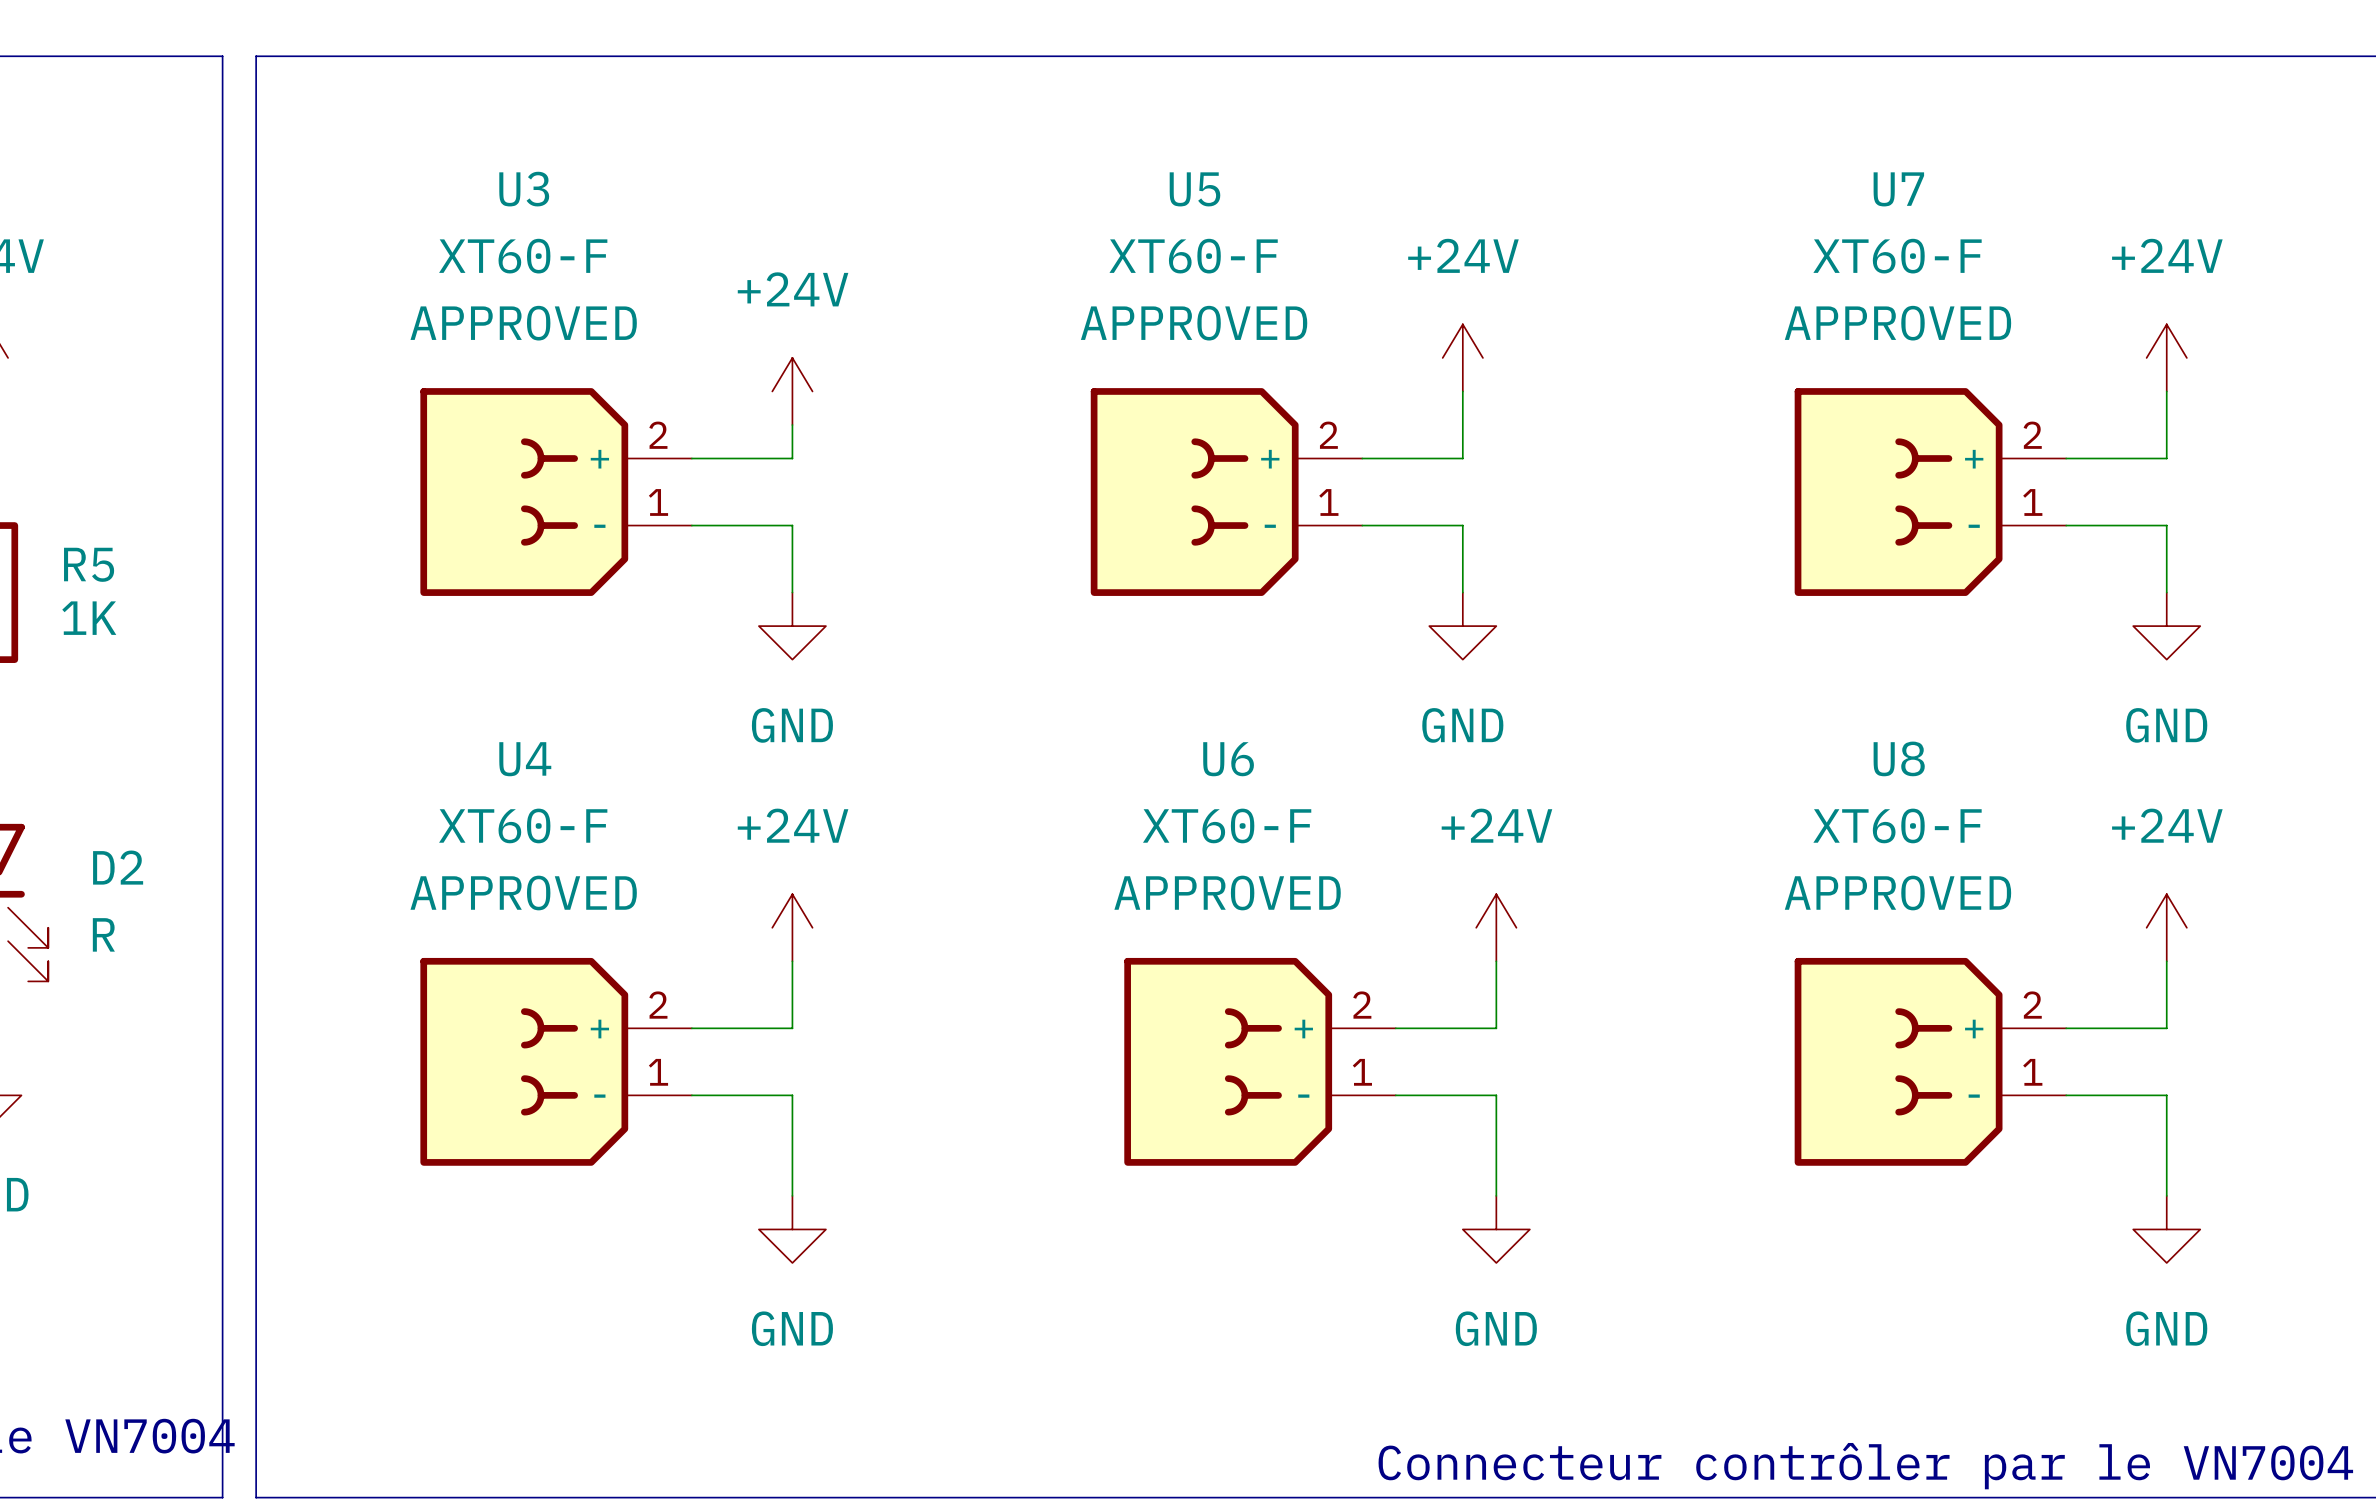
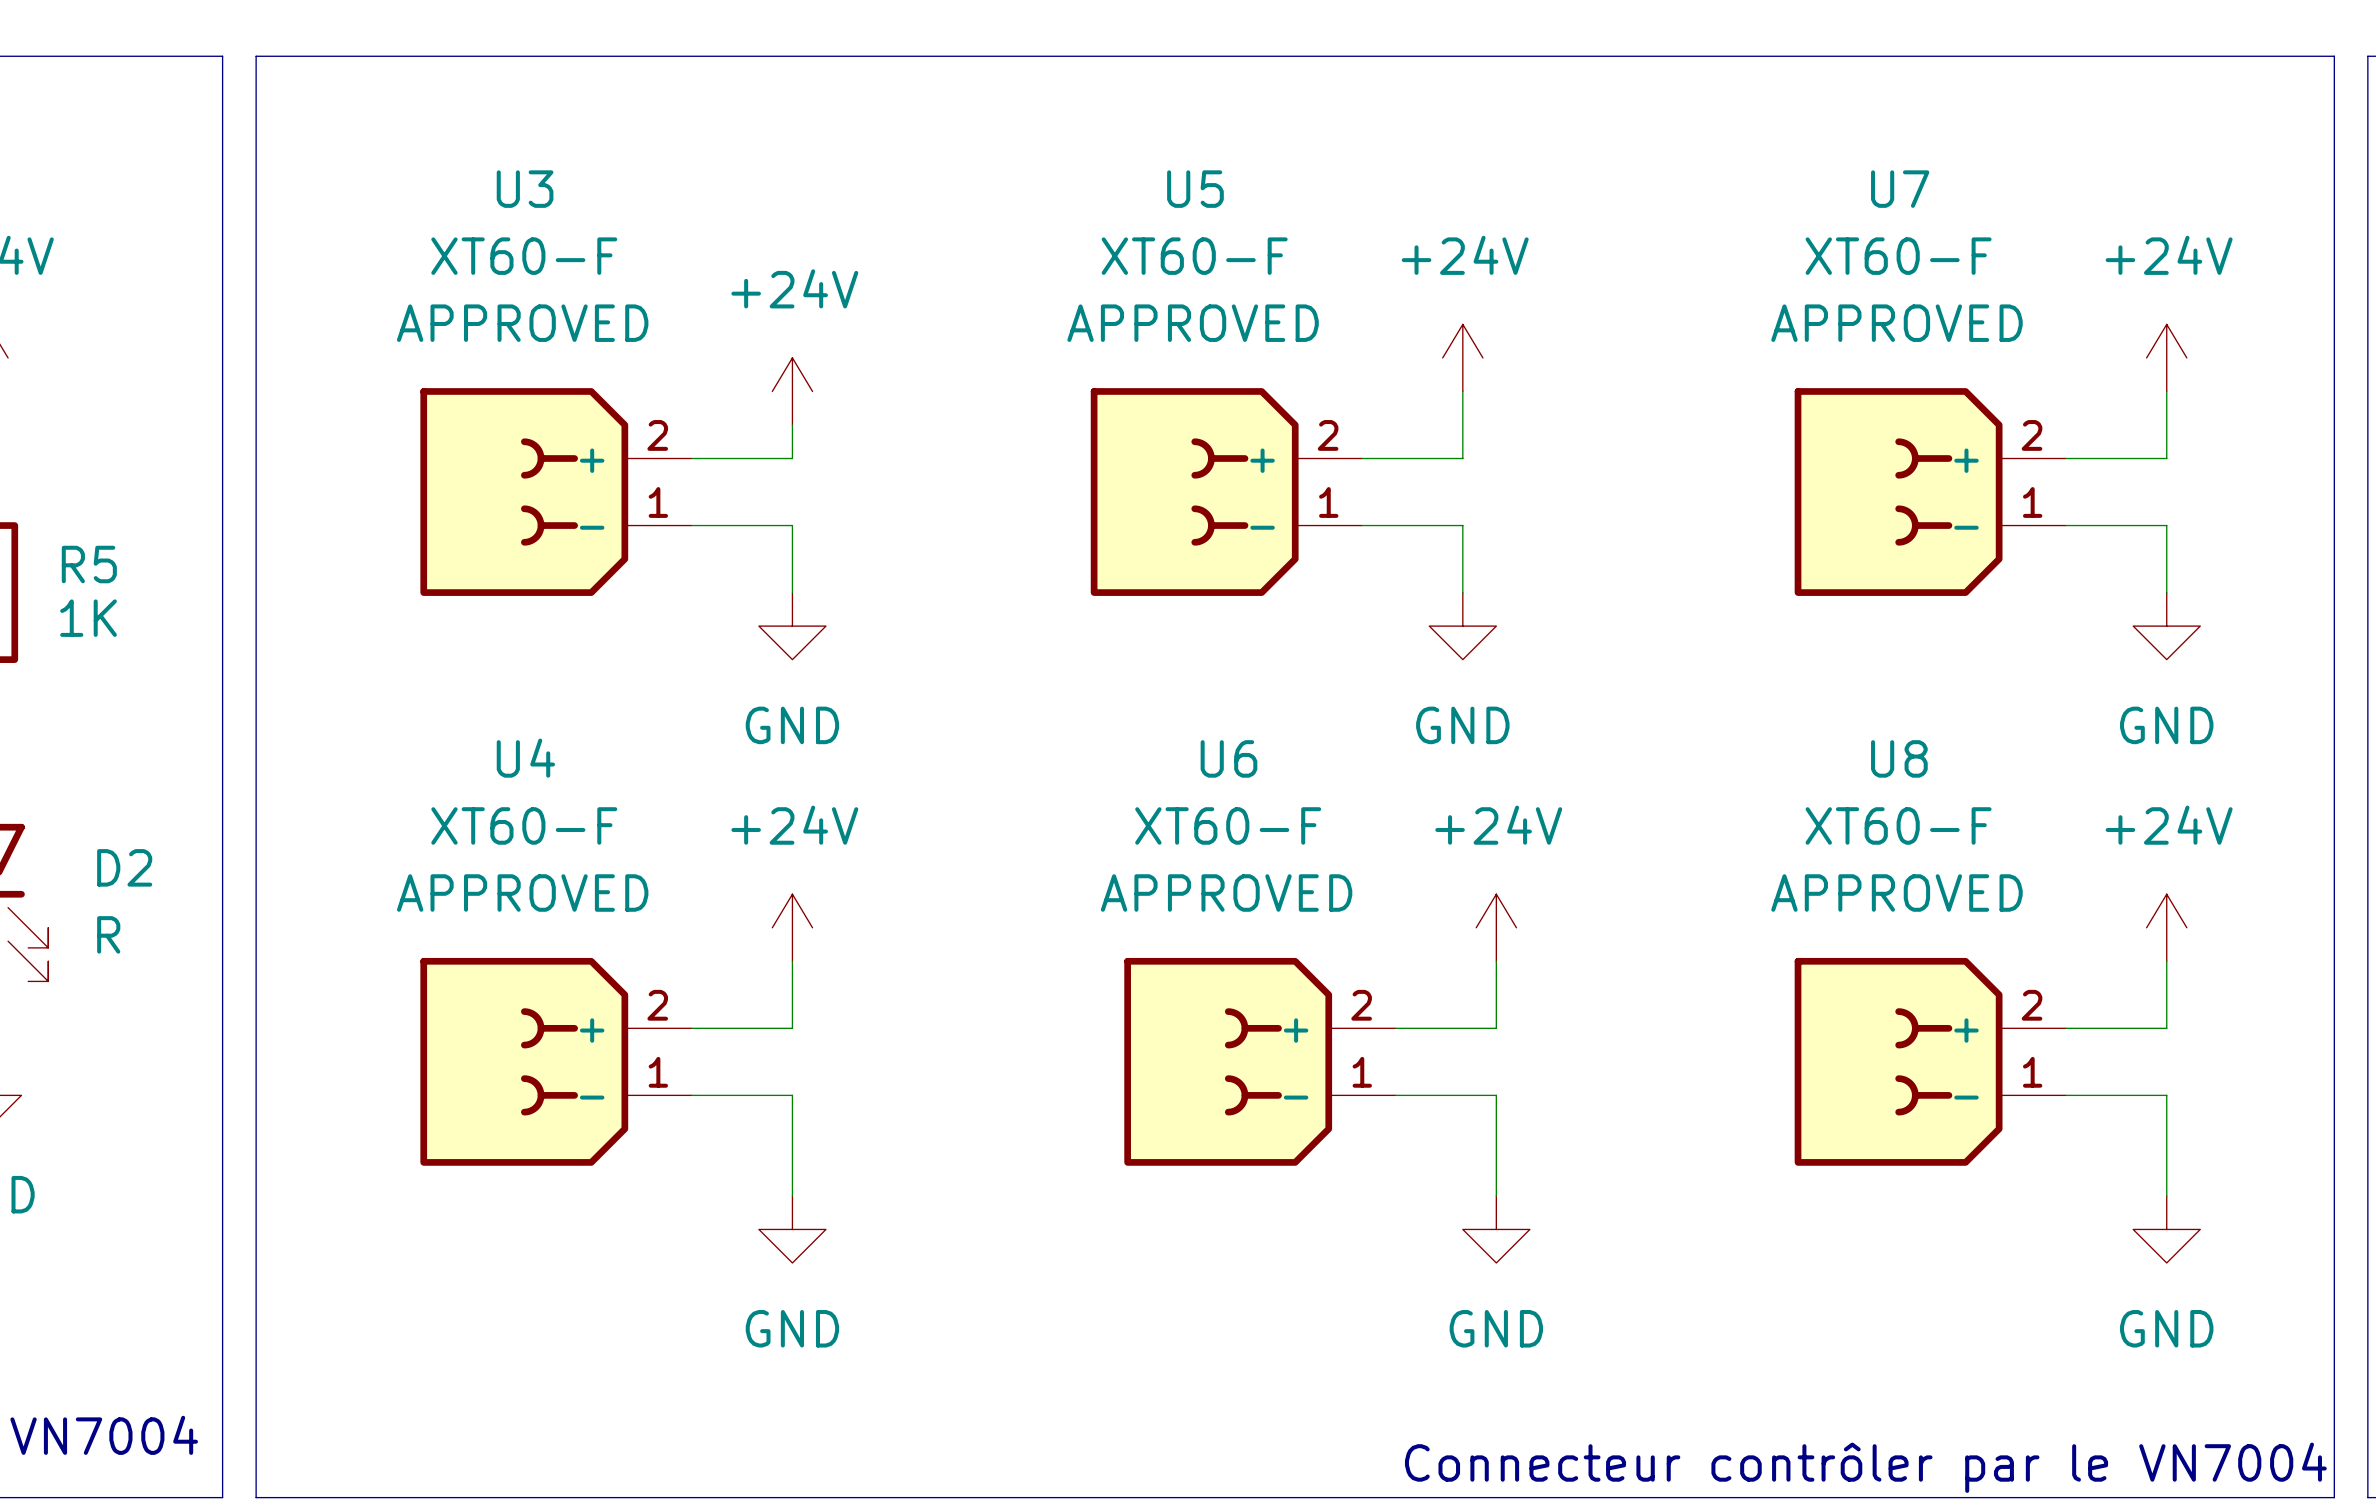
line: (2334, 56) (2367, 56) -> (2334, 56) (2334, 1497)
line: (2334, 1497) (2367, 1497) -> (2367, 56) (2367, 1497)

